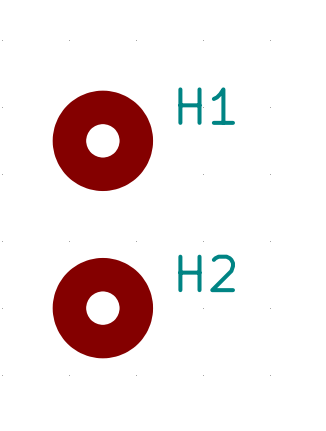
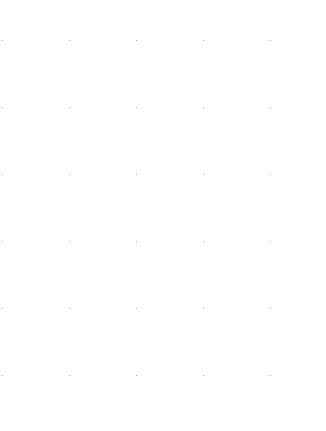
H1: (102, 140) -> none
H2: (102, 308) -> none

